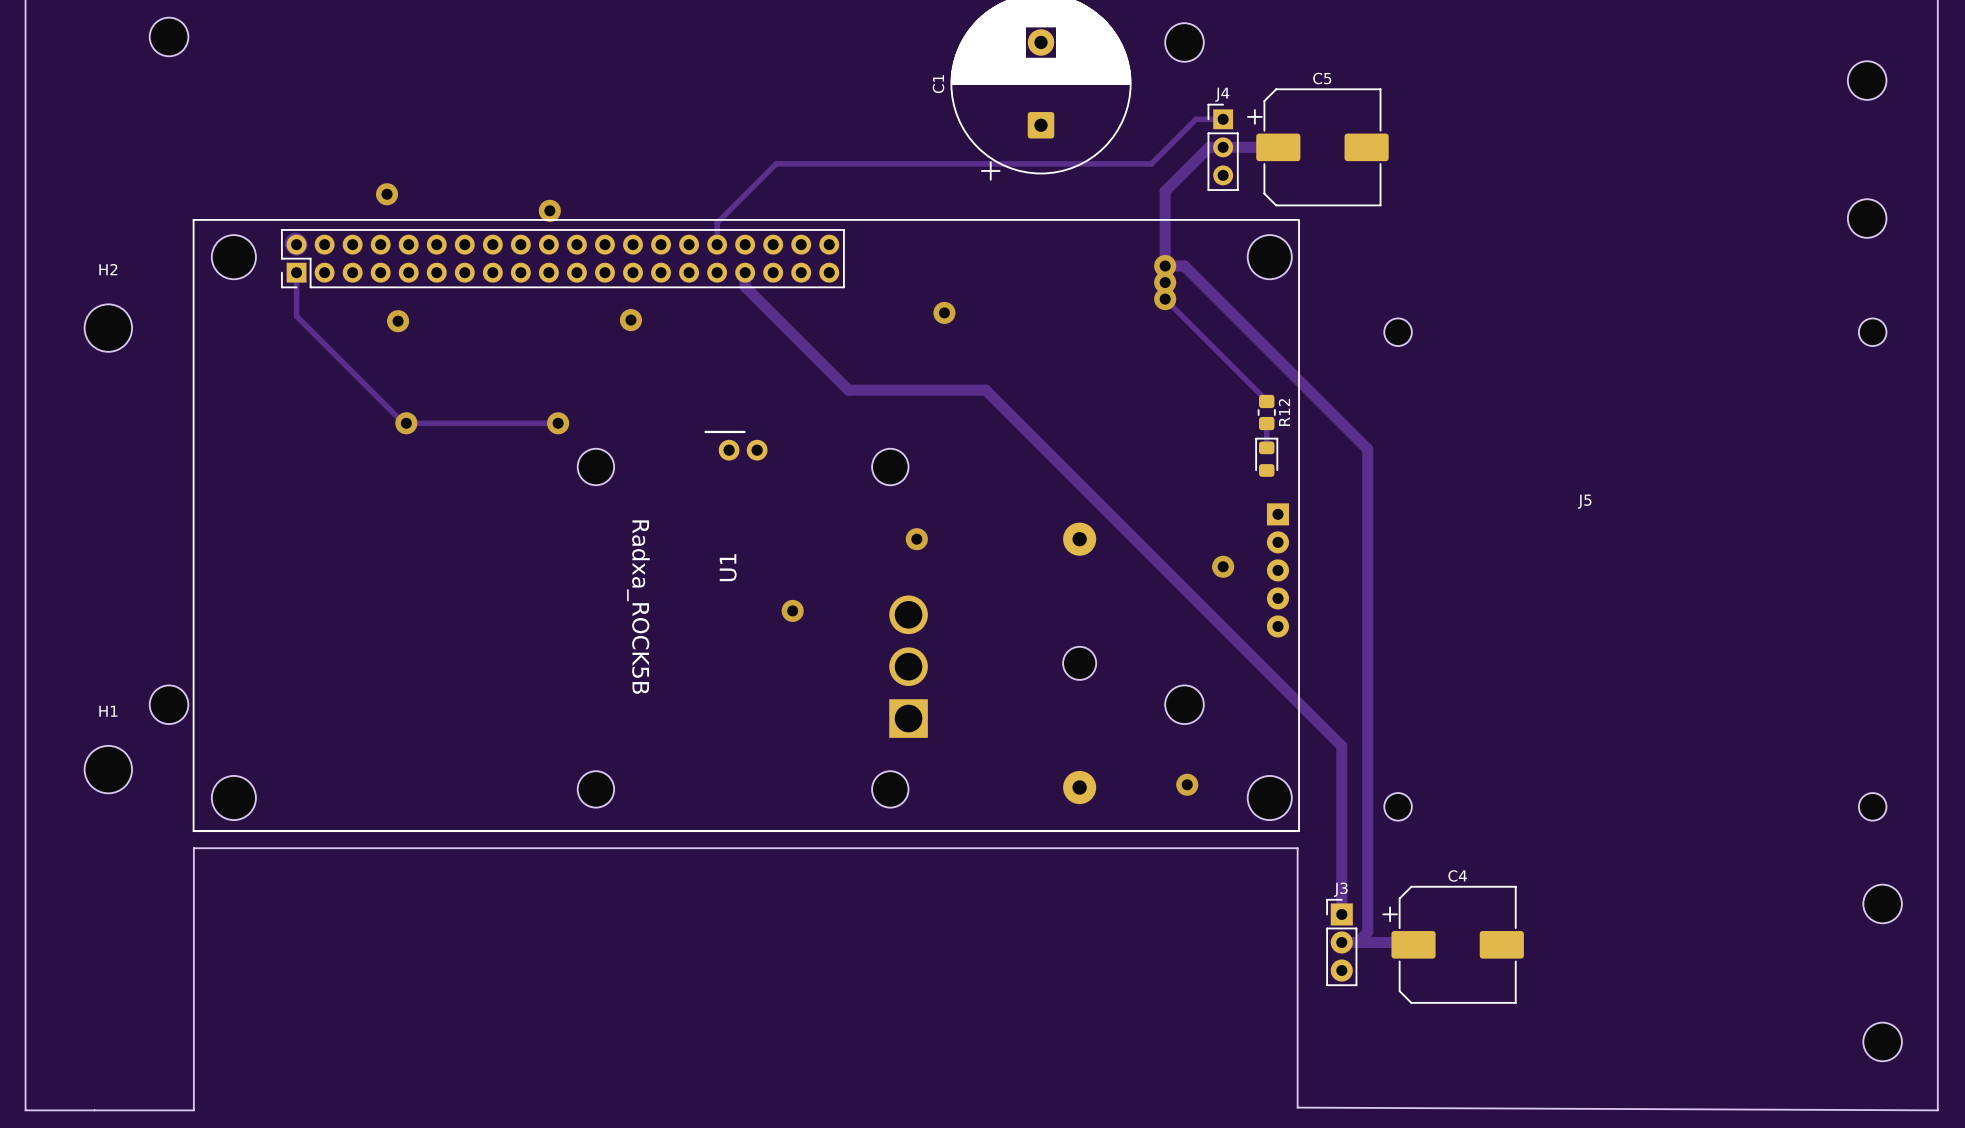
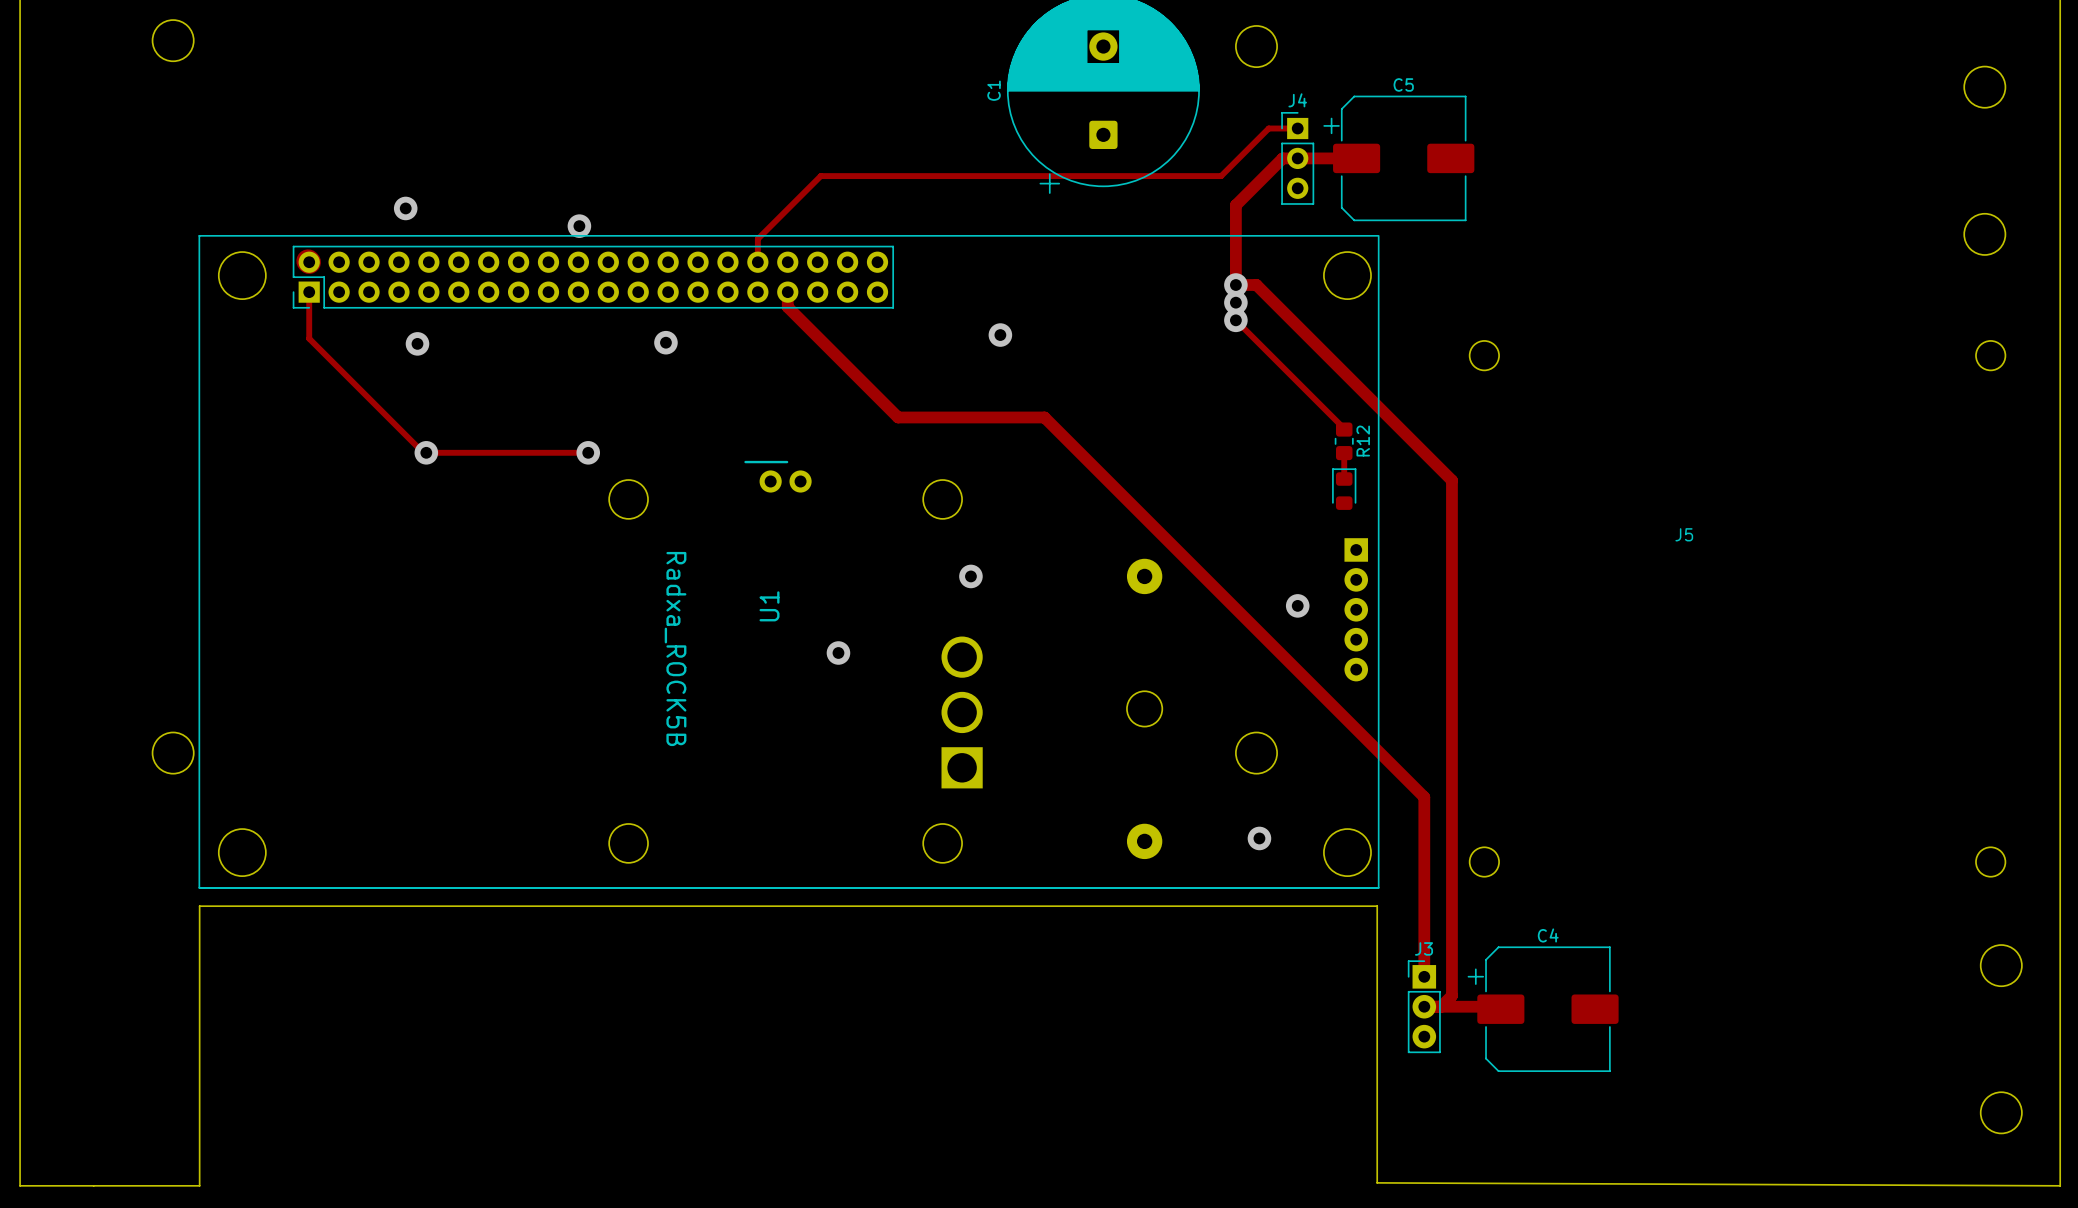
H2: (108, 328) -> none
H1: (108, 769) -> none

